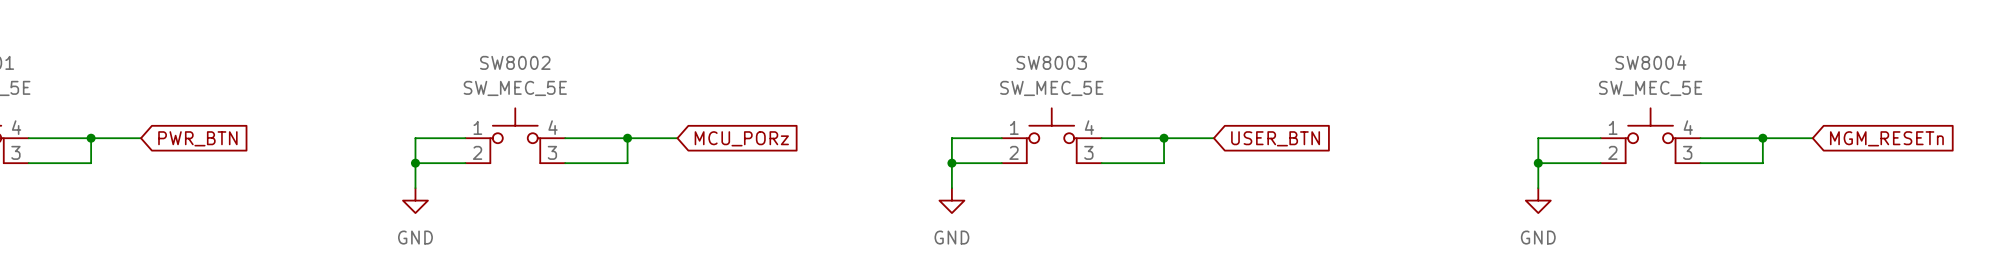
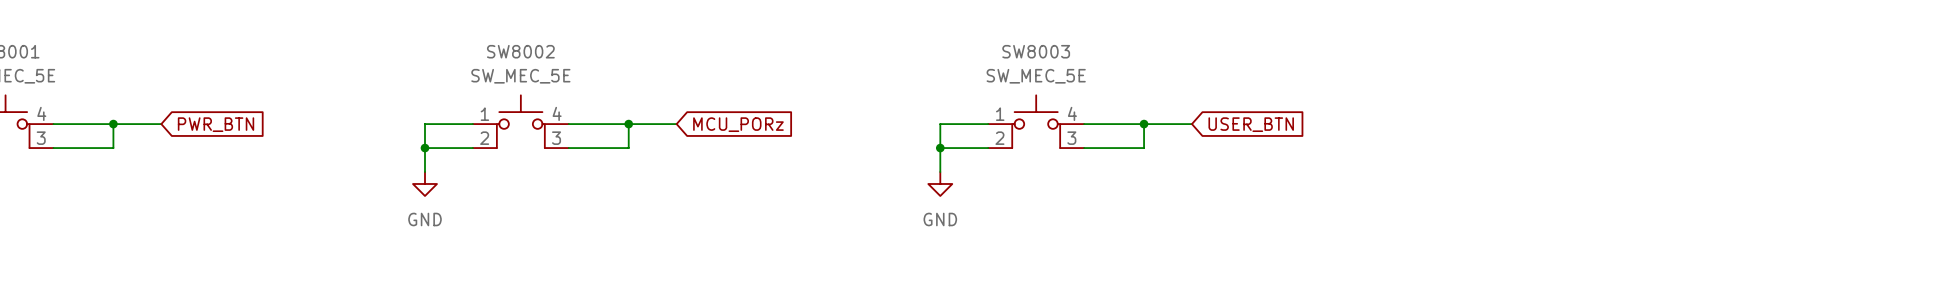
SW8004: SW_MEC_5E (1650, 135) -> none
wire: (1600, 138) (1538, 138) (1538, 188) -> none
wire: (1700, 138) (1812, 138) -> none
wire: (1762, 138) (1762, 163) (1700, 163) -> none
junction: (1762, 138) -> none
global label: MGM_RESETn (1886, 138) -> none
wire: (1538, 163) (1600, 163) -> none
junction: (1538, 163) -> none
power symbol: GND (1538, 200) -> none

